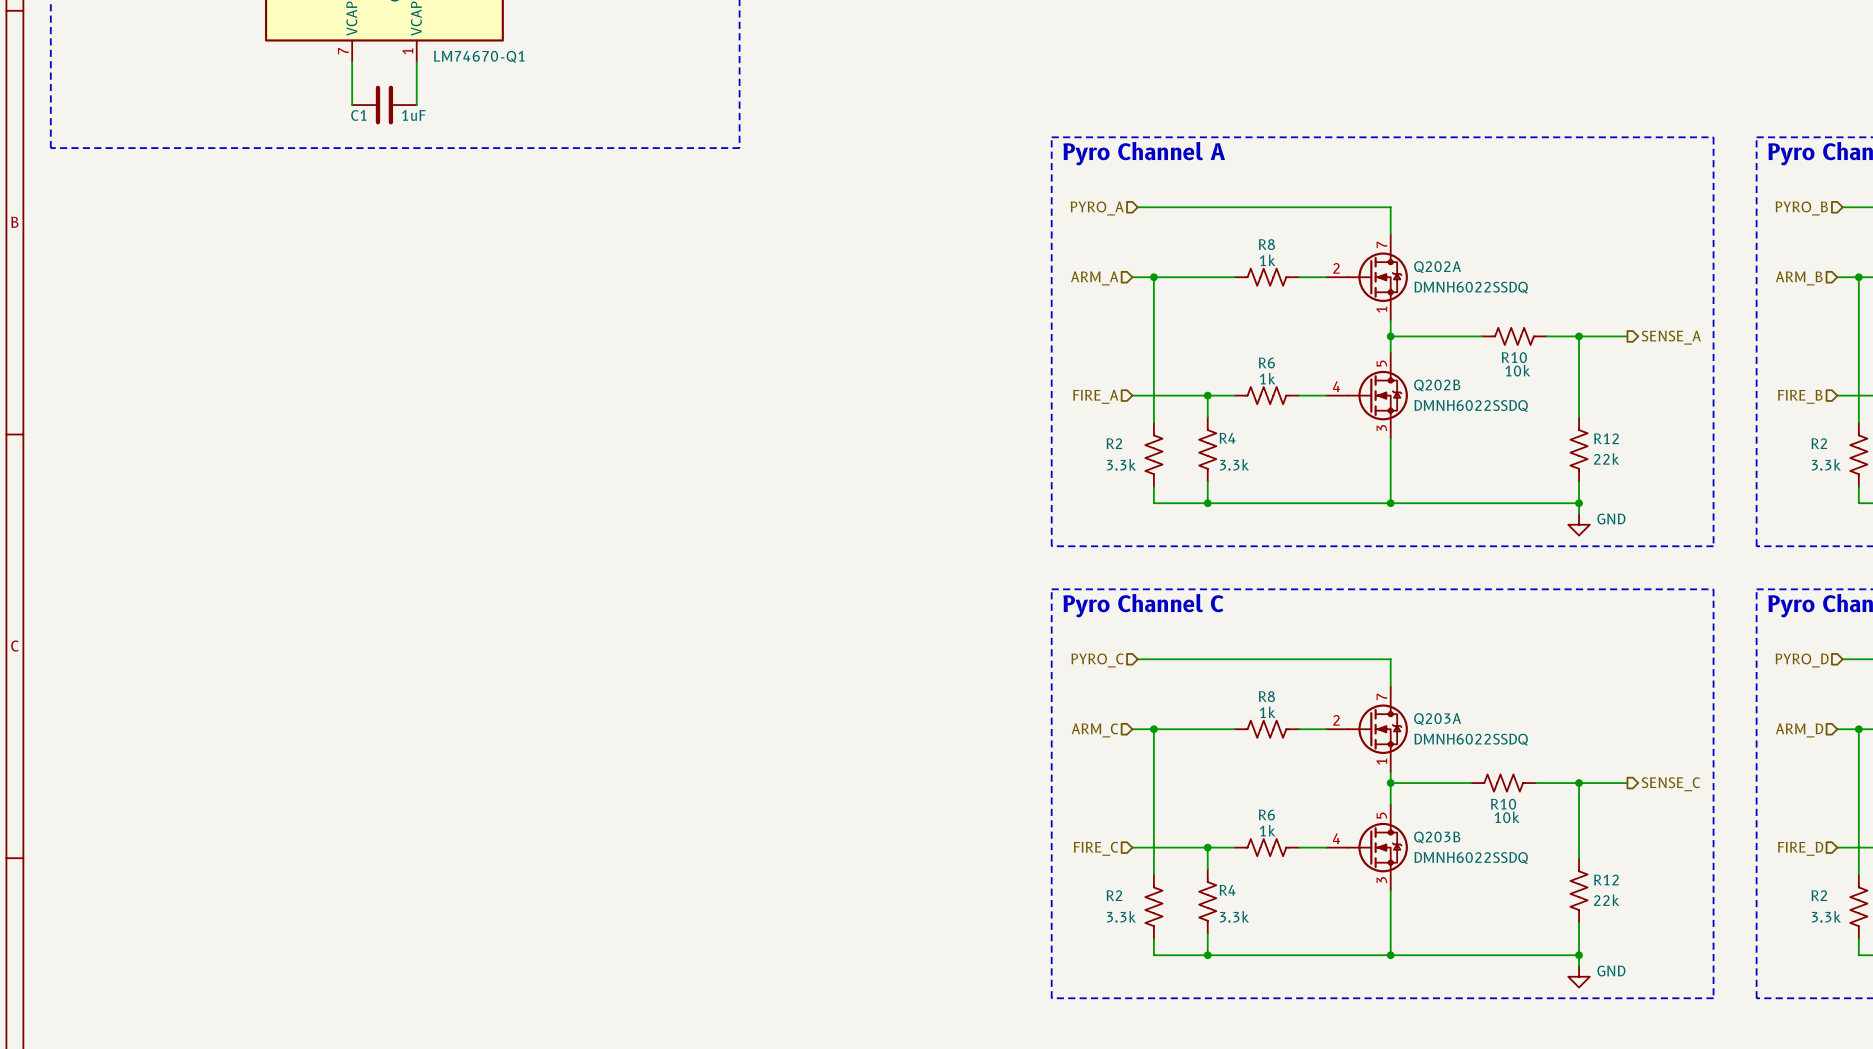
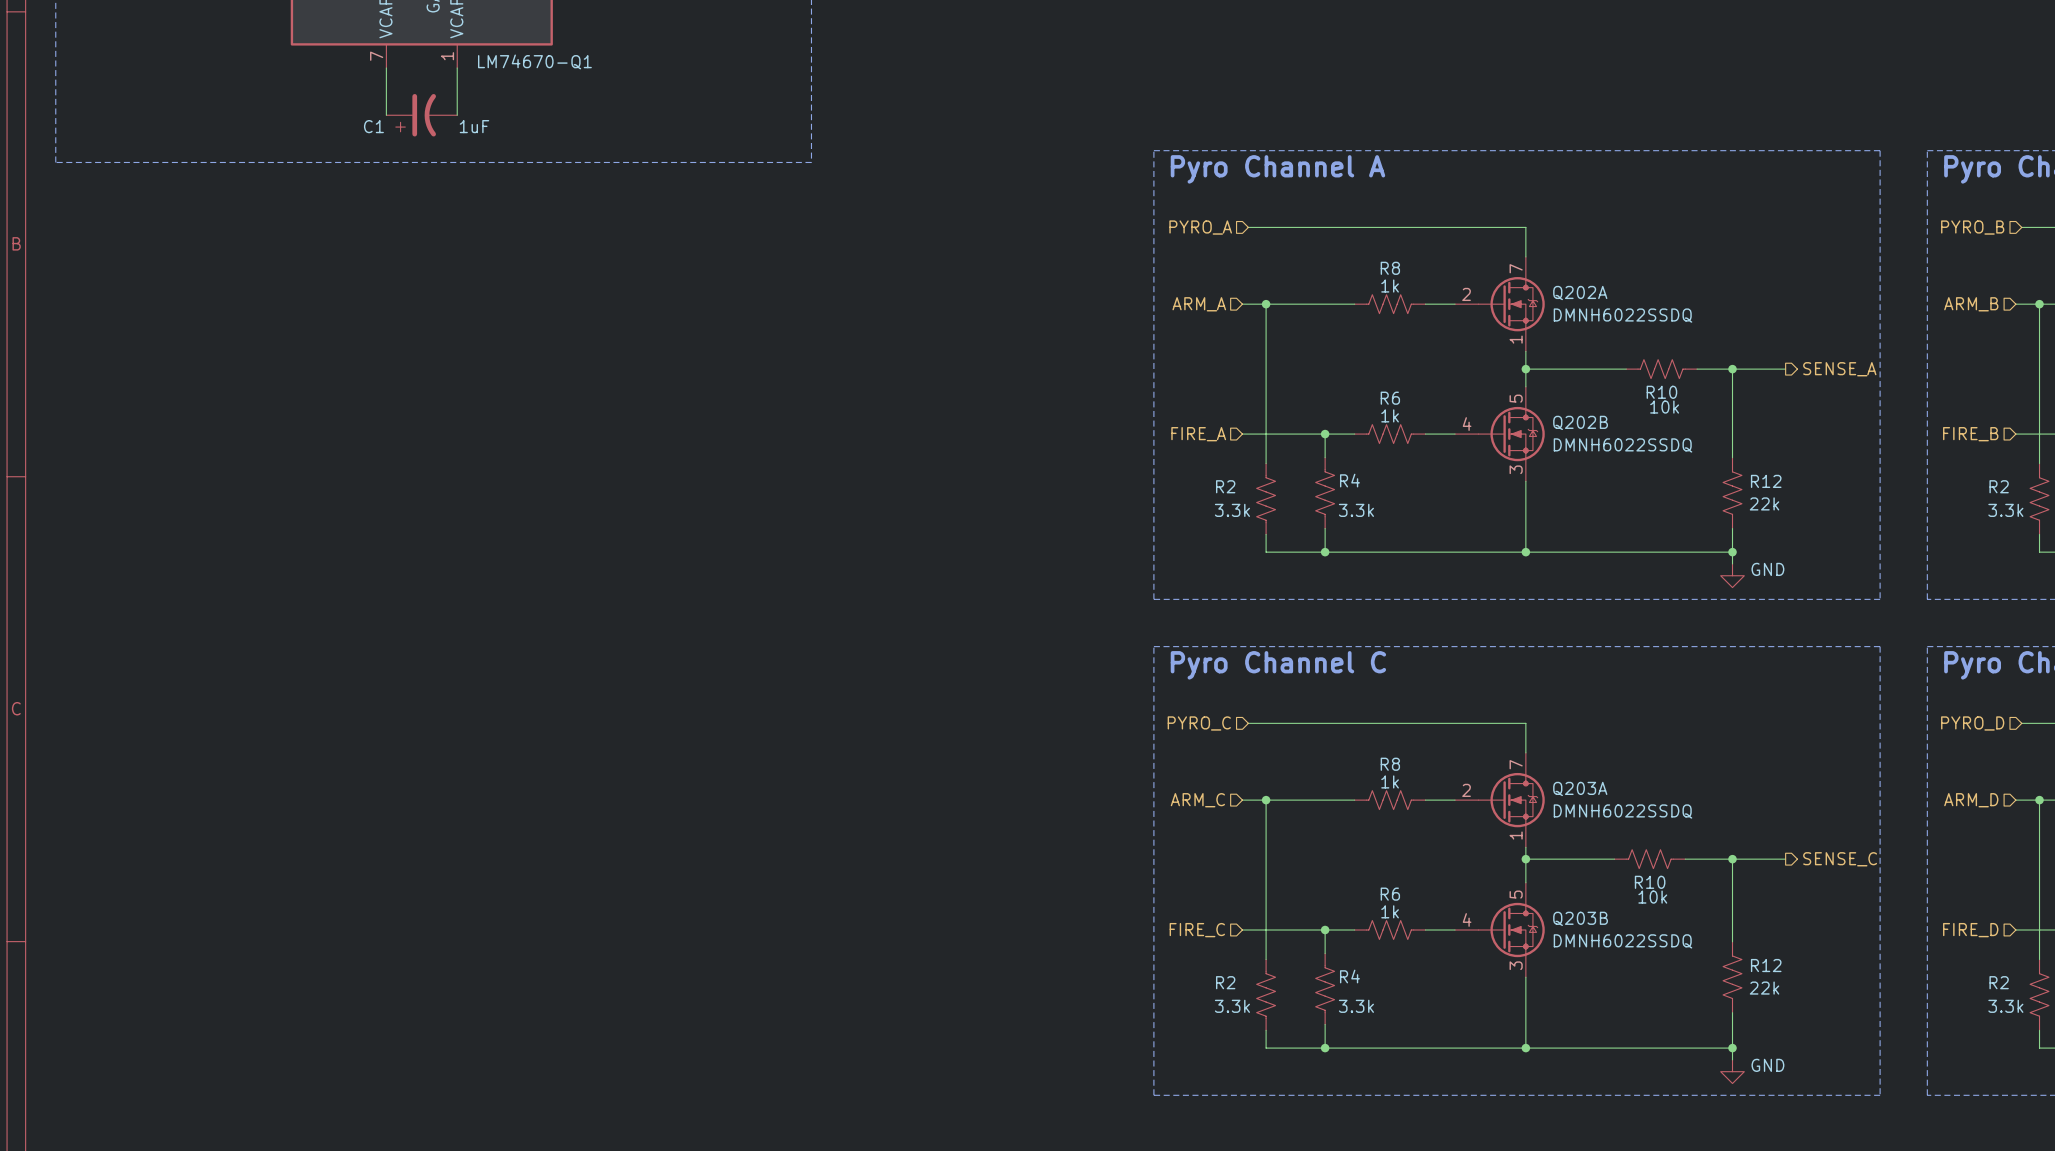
C1 symbol: [352, 85, 417, 125] -> [386, 93, 458, 137]

